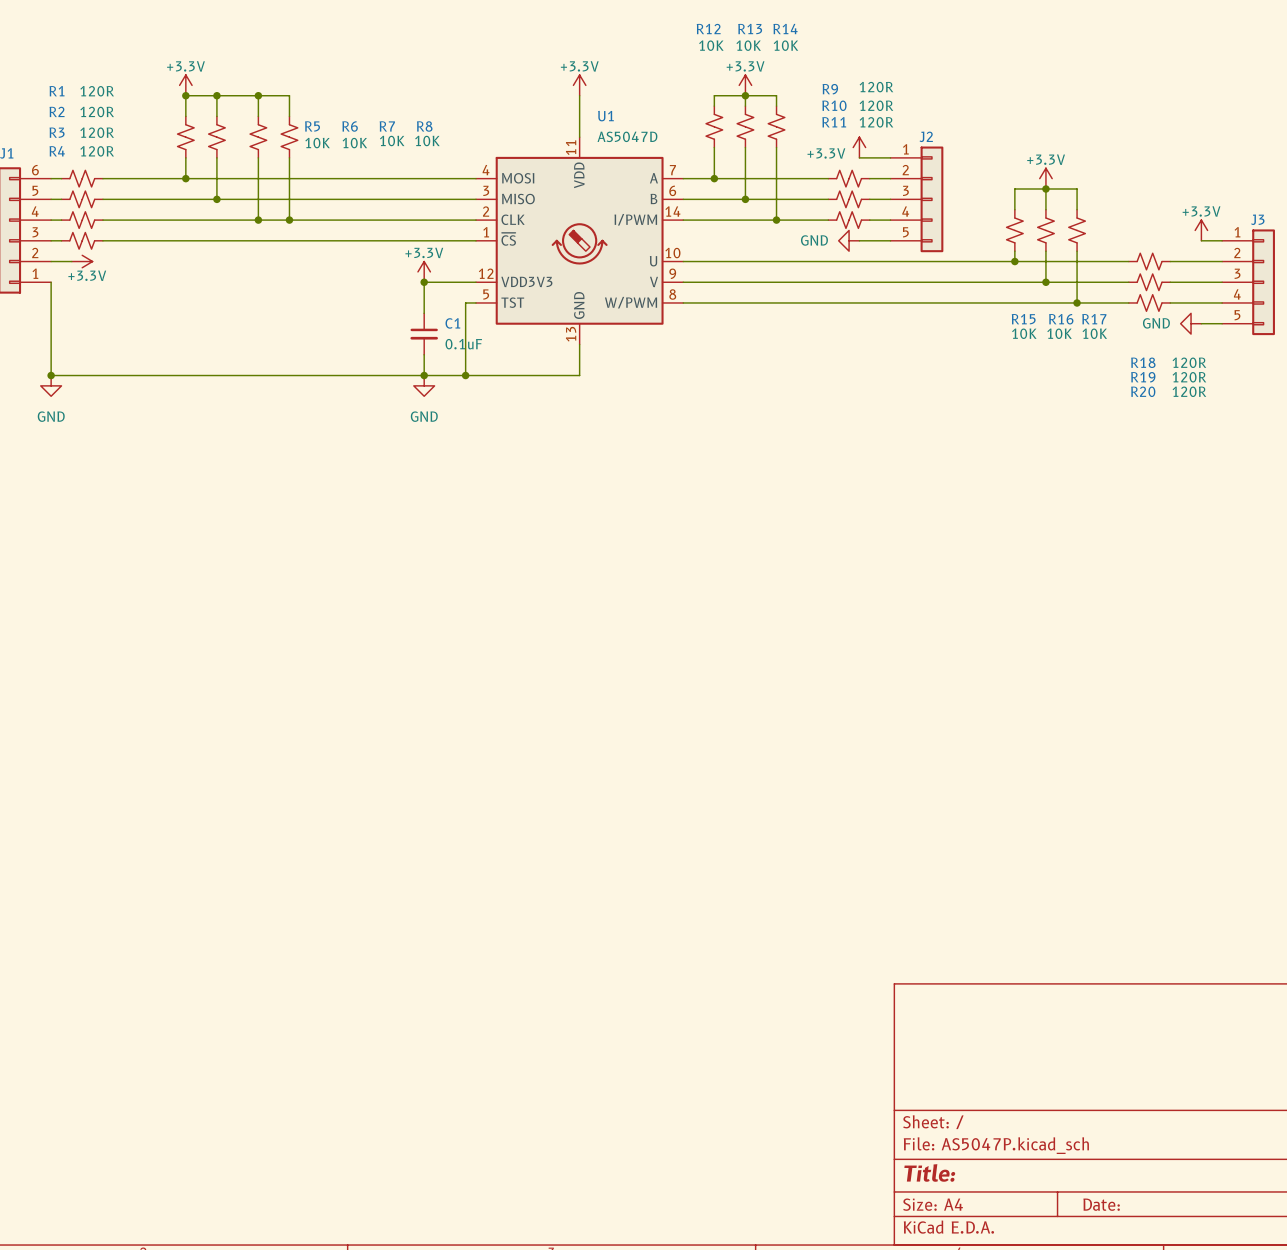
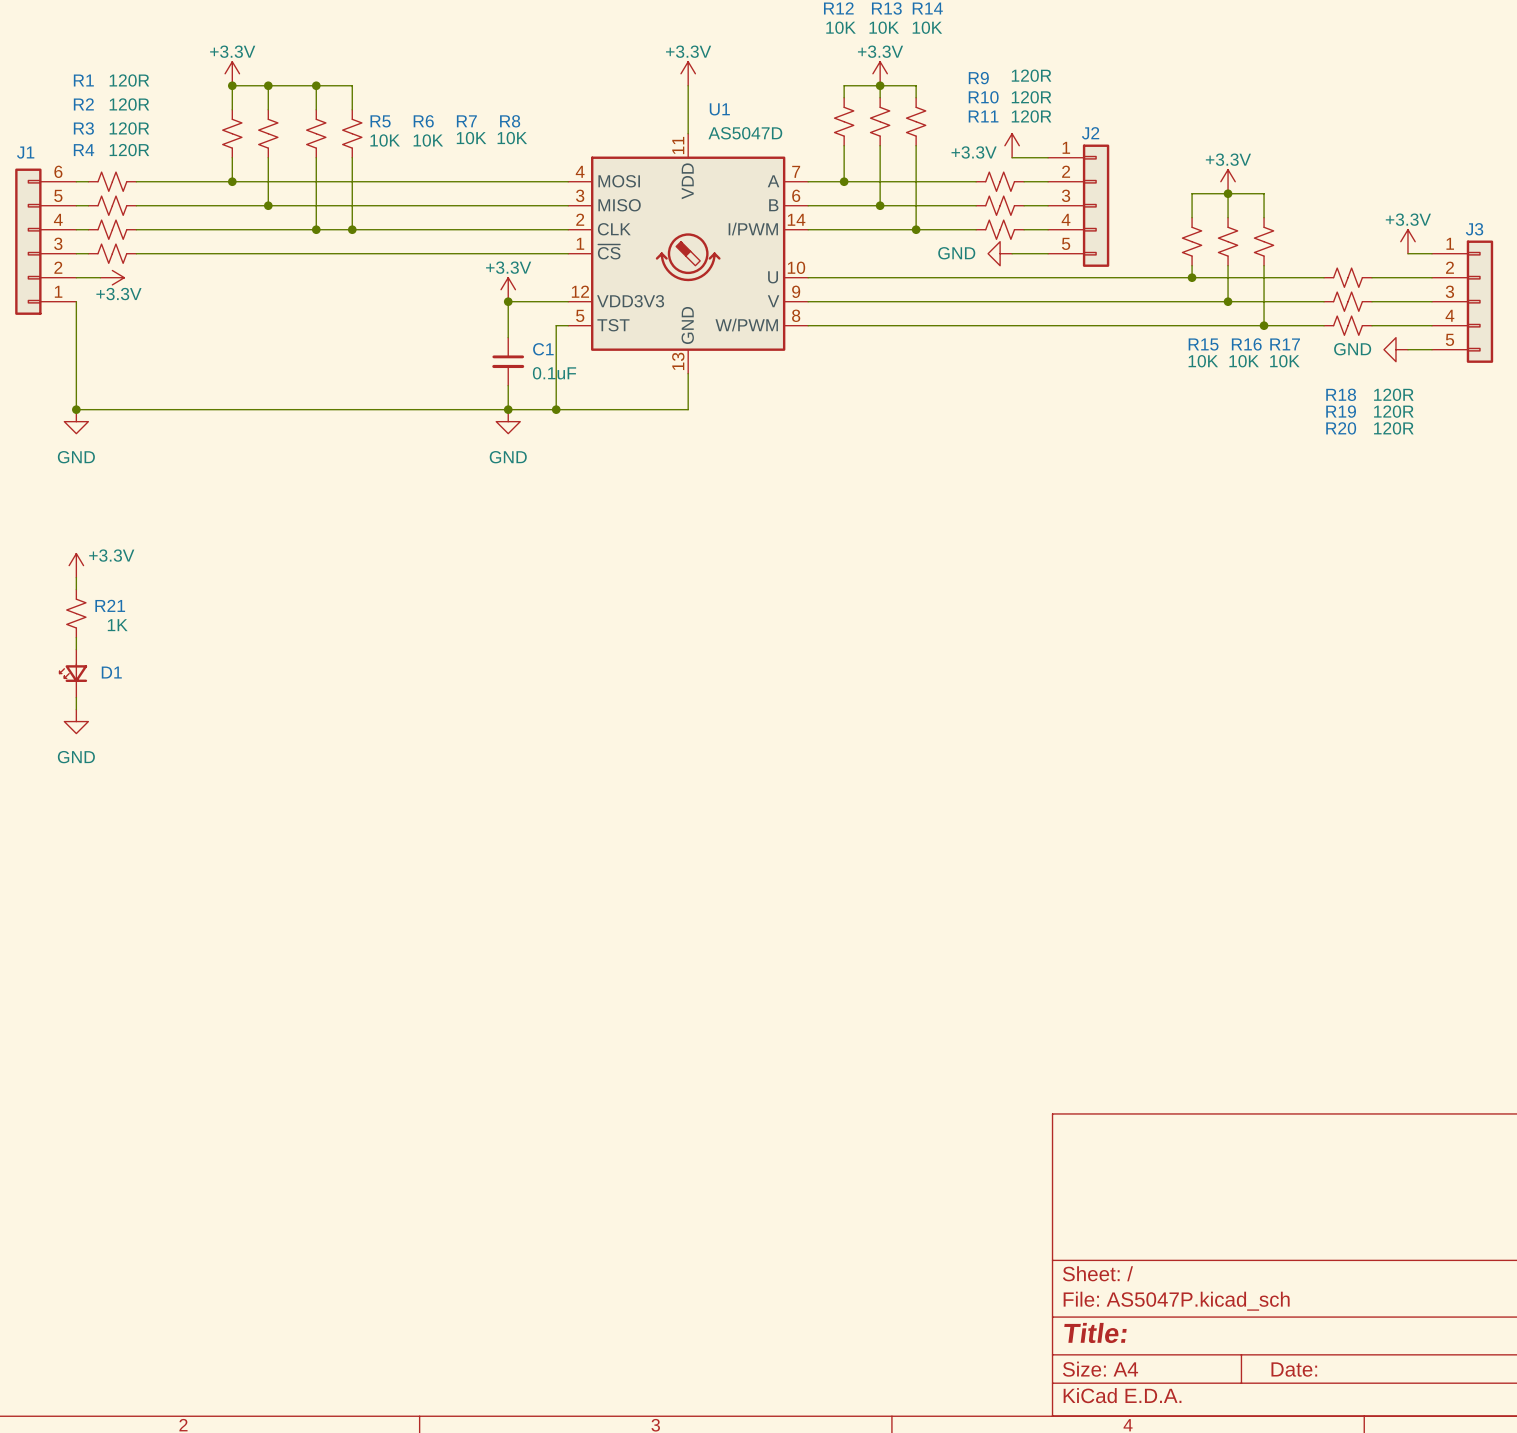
power symbol: none -> +3.3V (76, 565)
wire: none -> (76, 577) (76, 589)
R21: none -> 1K (76, 613)
wire: none -> (76, 637) (76, 649)
D1: none -> (73, 673)
wire: none -> (76, 697) (76, 709)
power symbol: none -> GND (76, 721)

